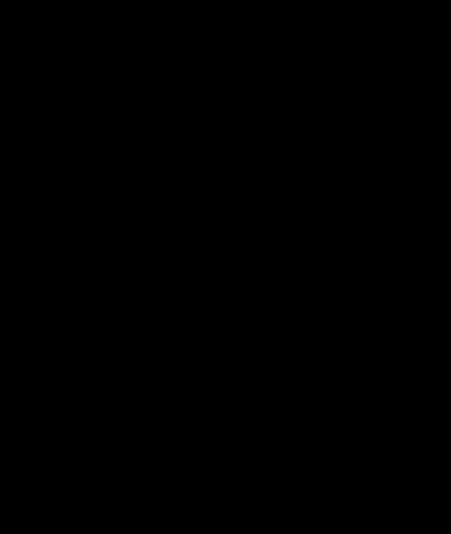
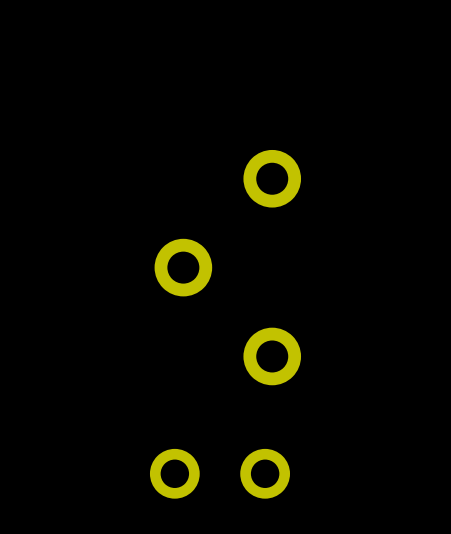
part: none -> (227, 267)
part: none -> (219, 473)

